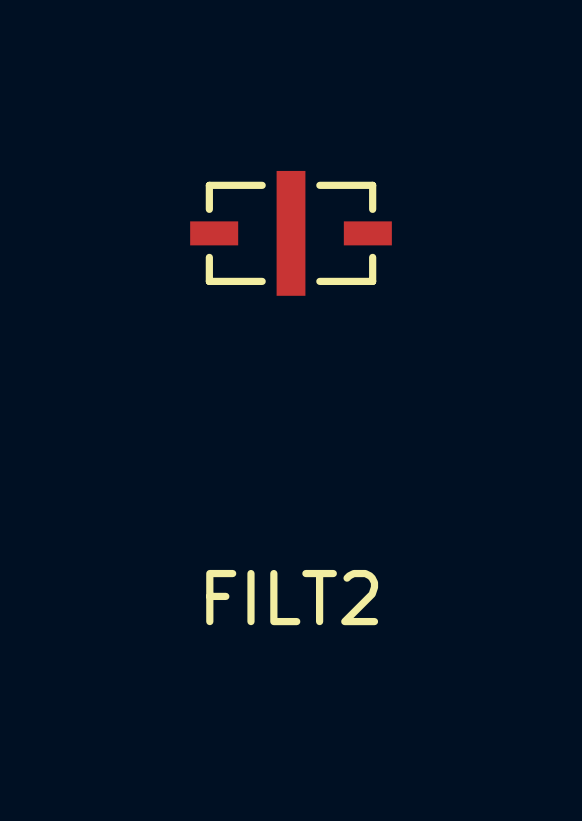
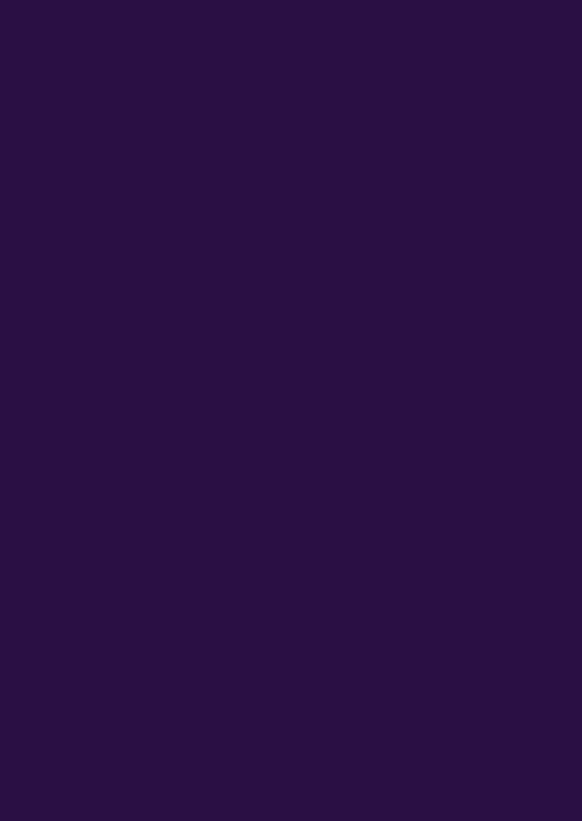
FILT2: (291, 233) -> none

